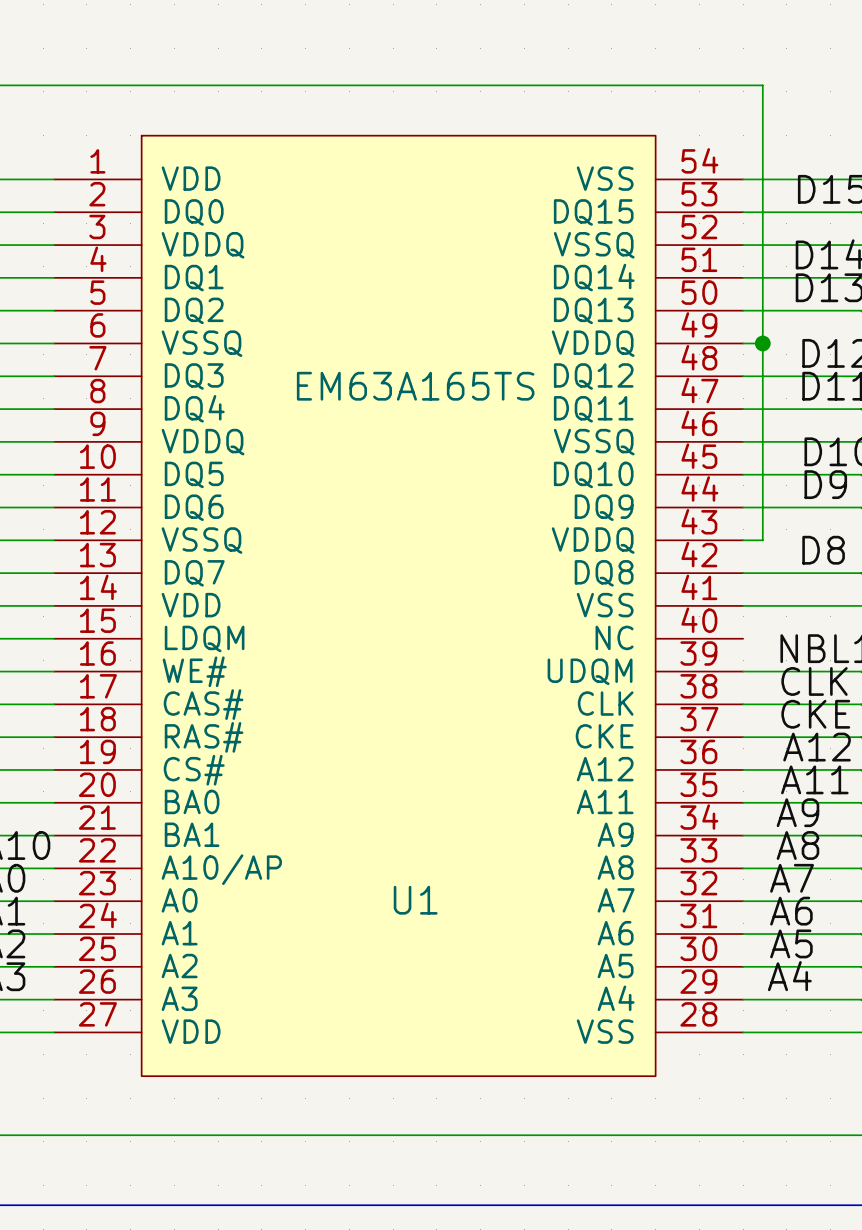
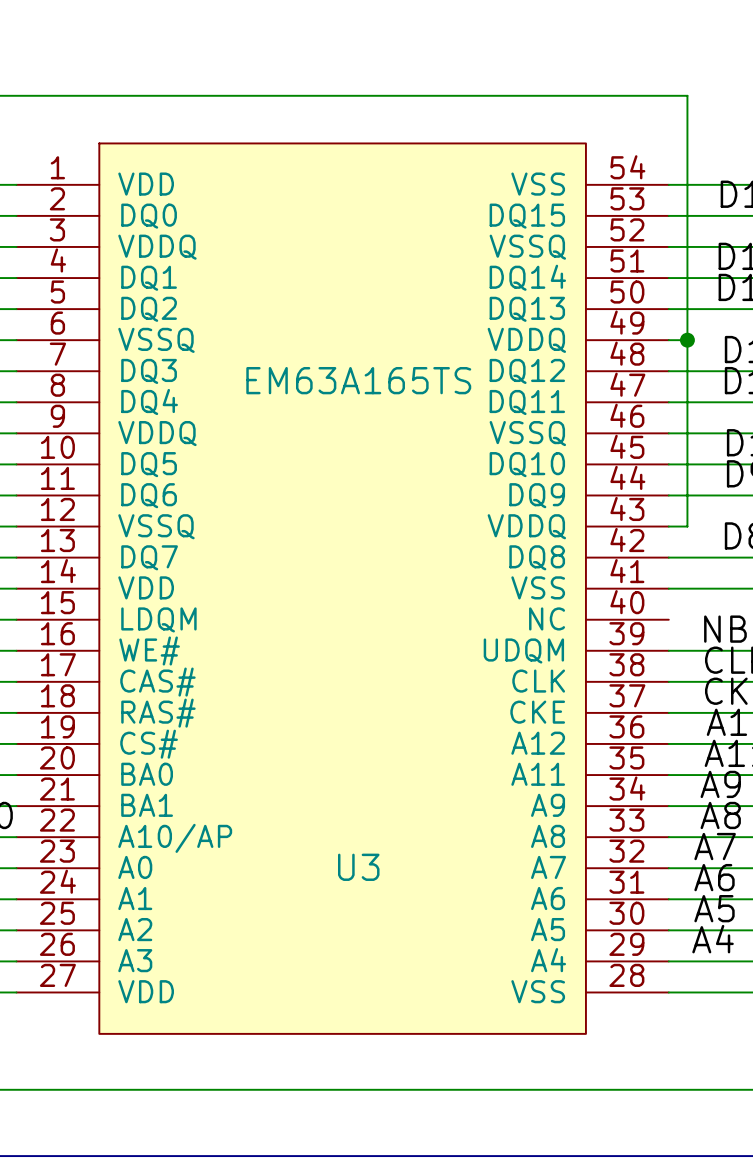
U1 name: U1 (415, 900) -> U3 (358, 867)

